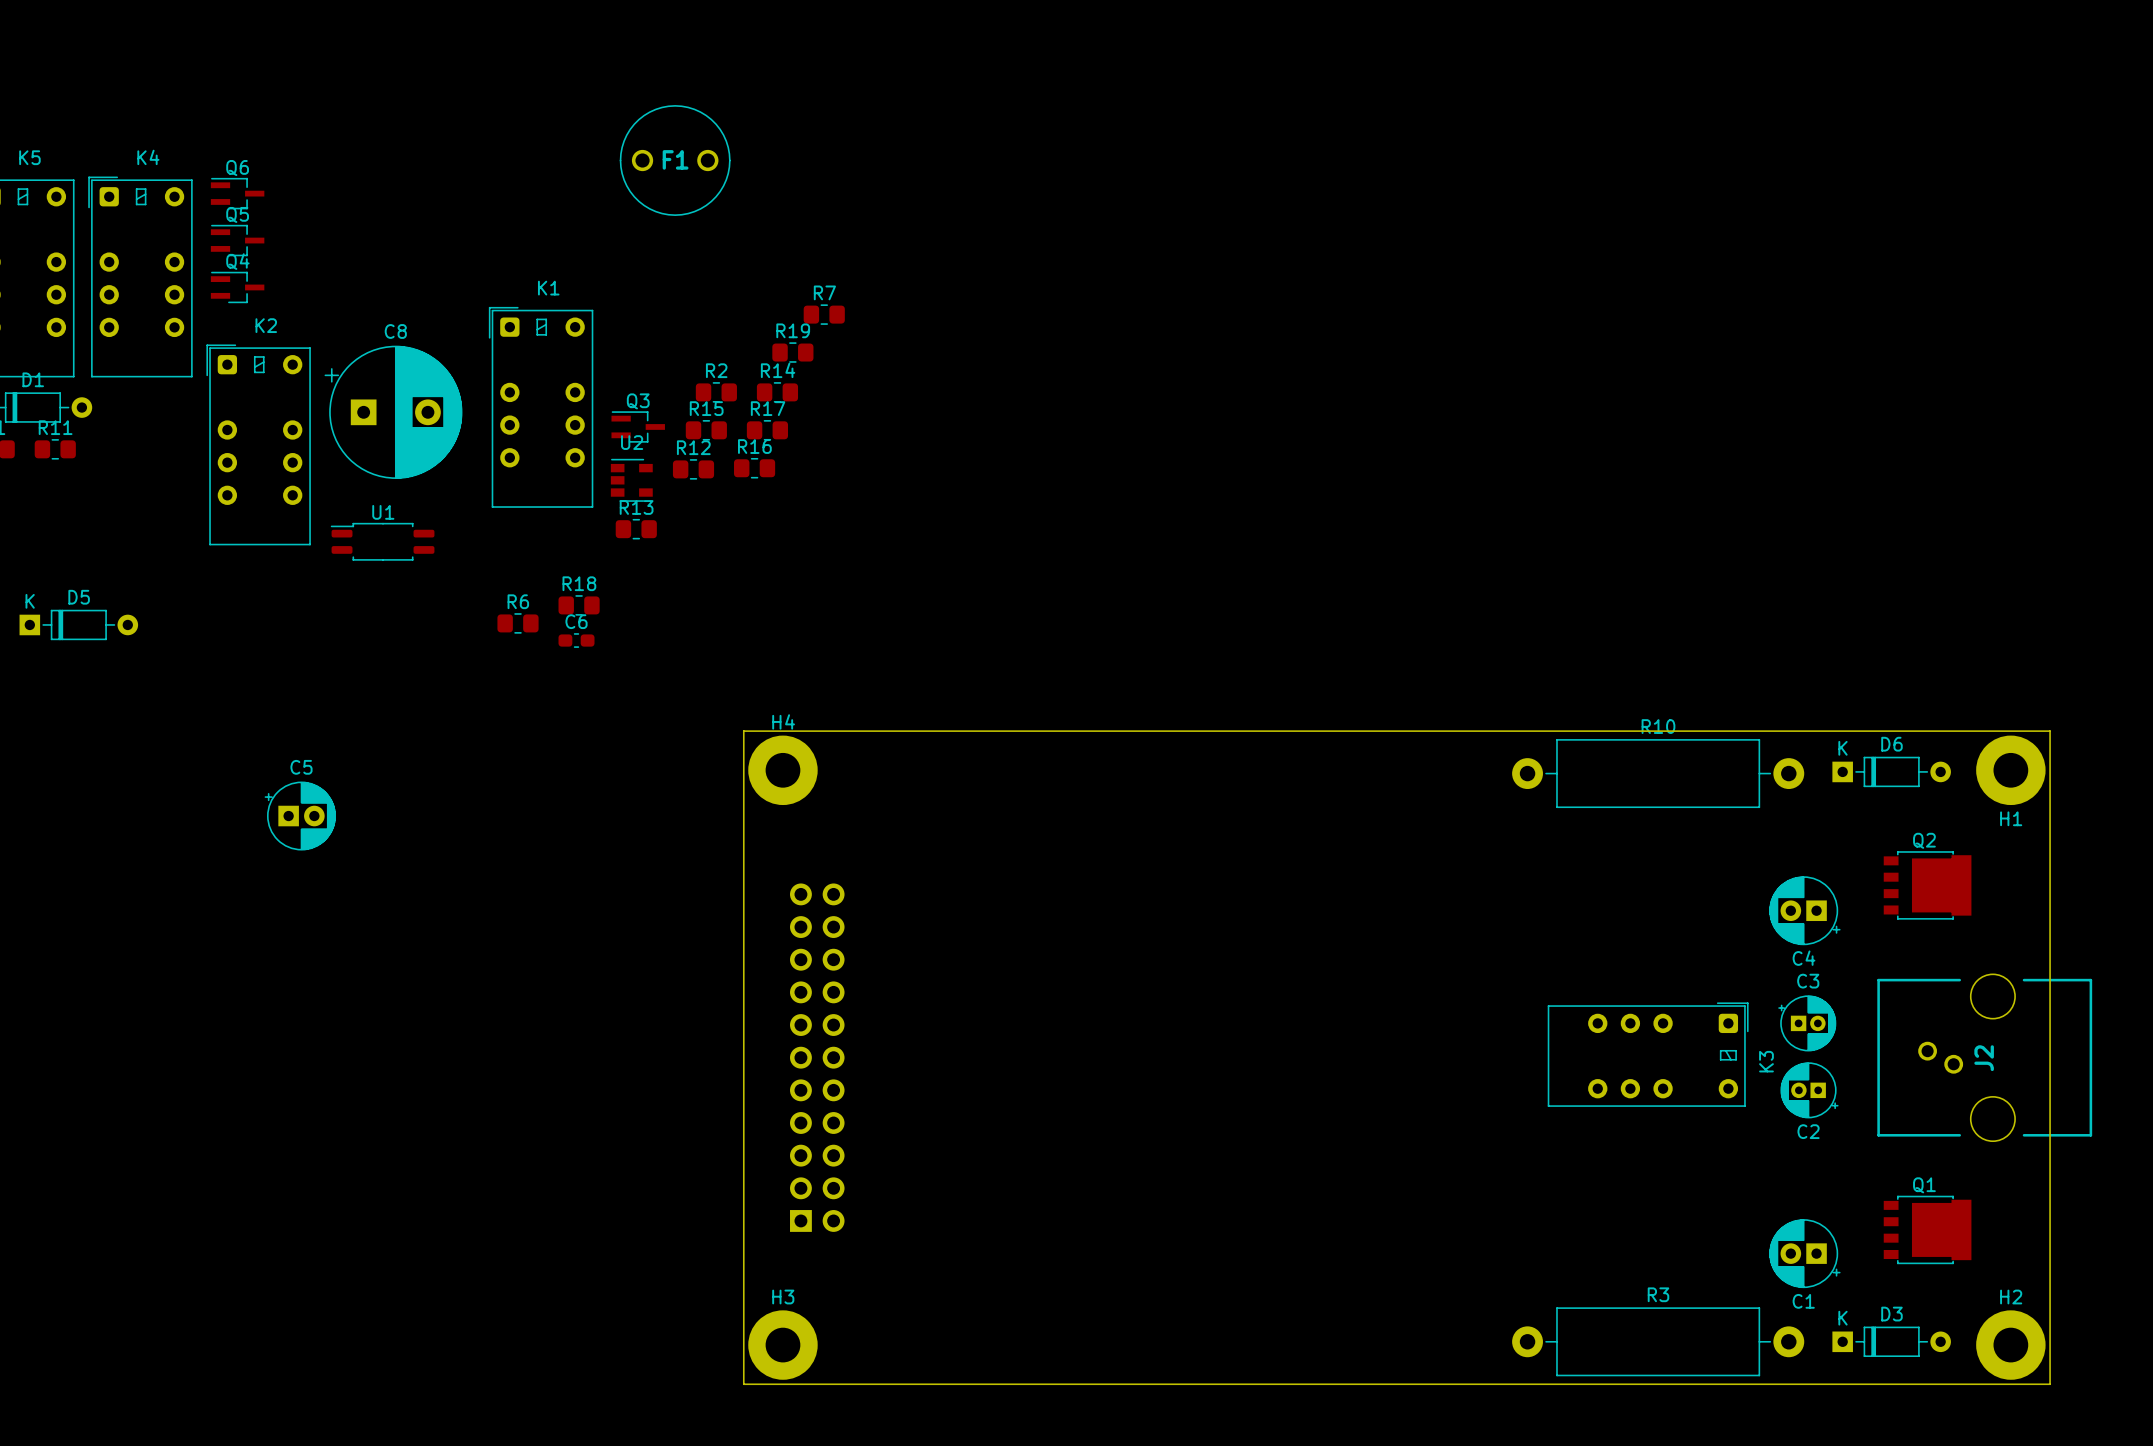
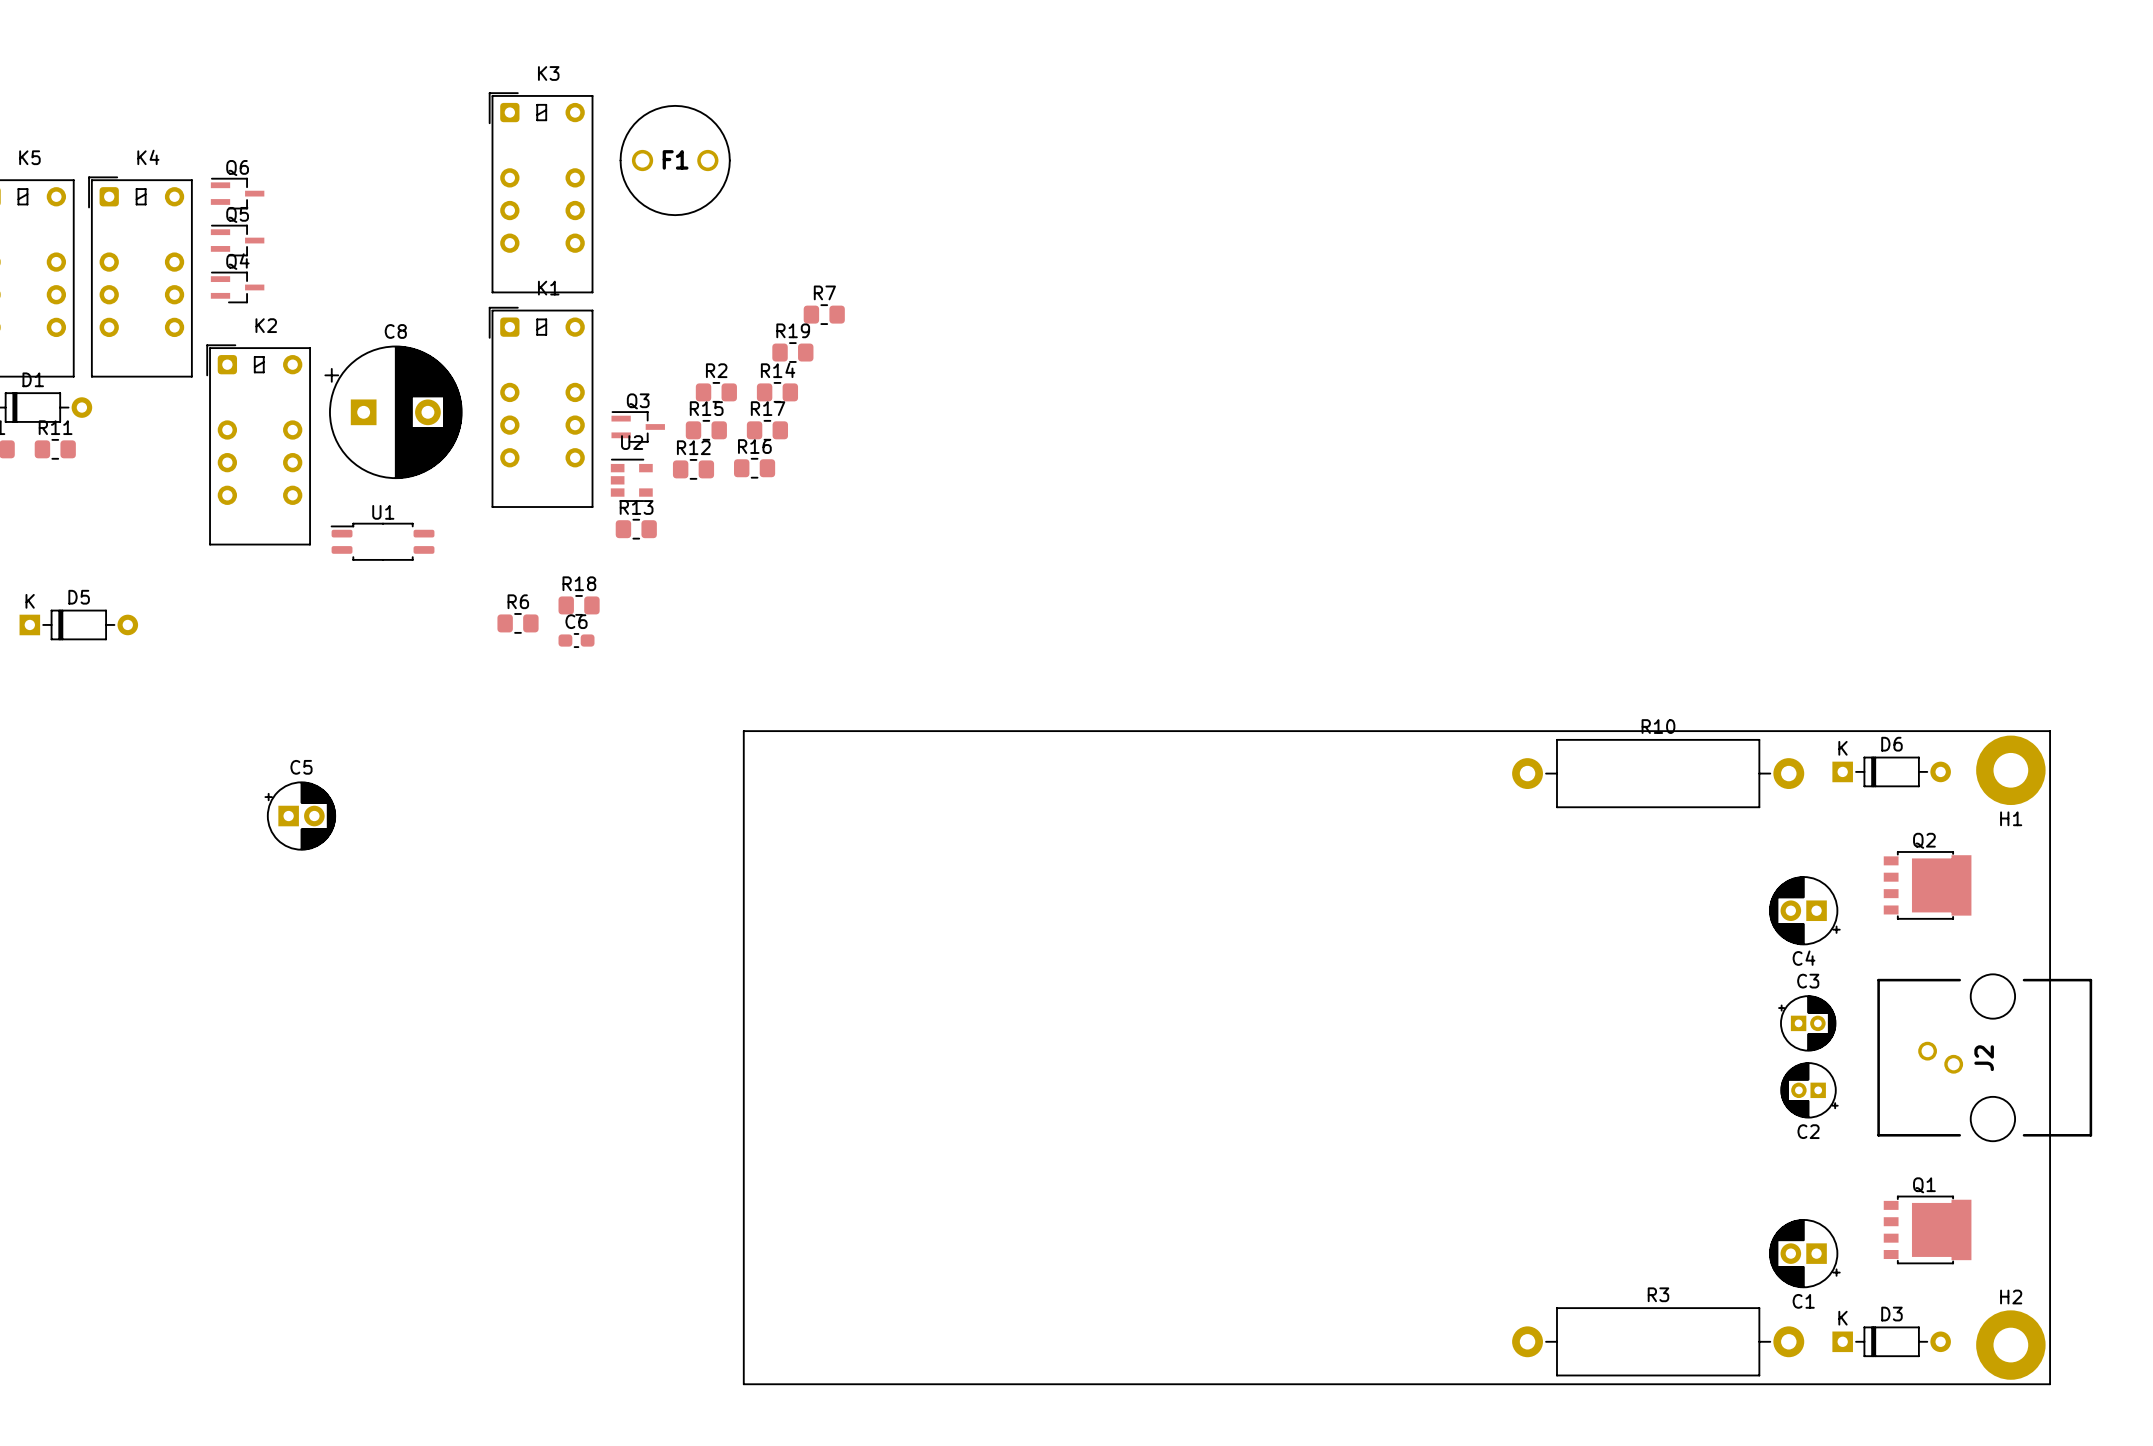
H4: (782, 770) -> none
K3 rotation: 0° (1648, 1054) -> 90° counterclockwise (541, 192)
K3 position: (1648, 1054) -> (541, 192)
part: (817, 1057) -> none
H3: (782, 1345) -> none

